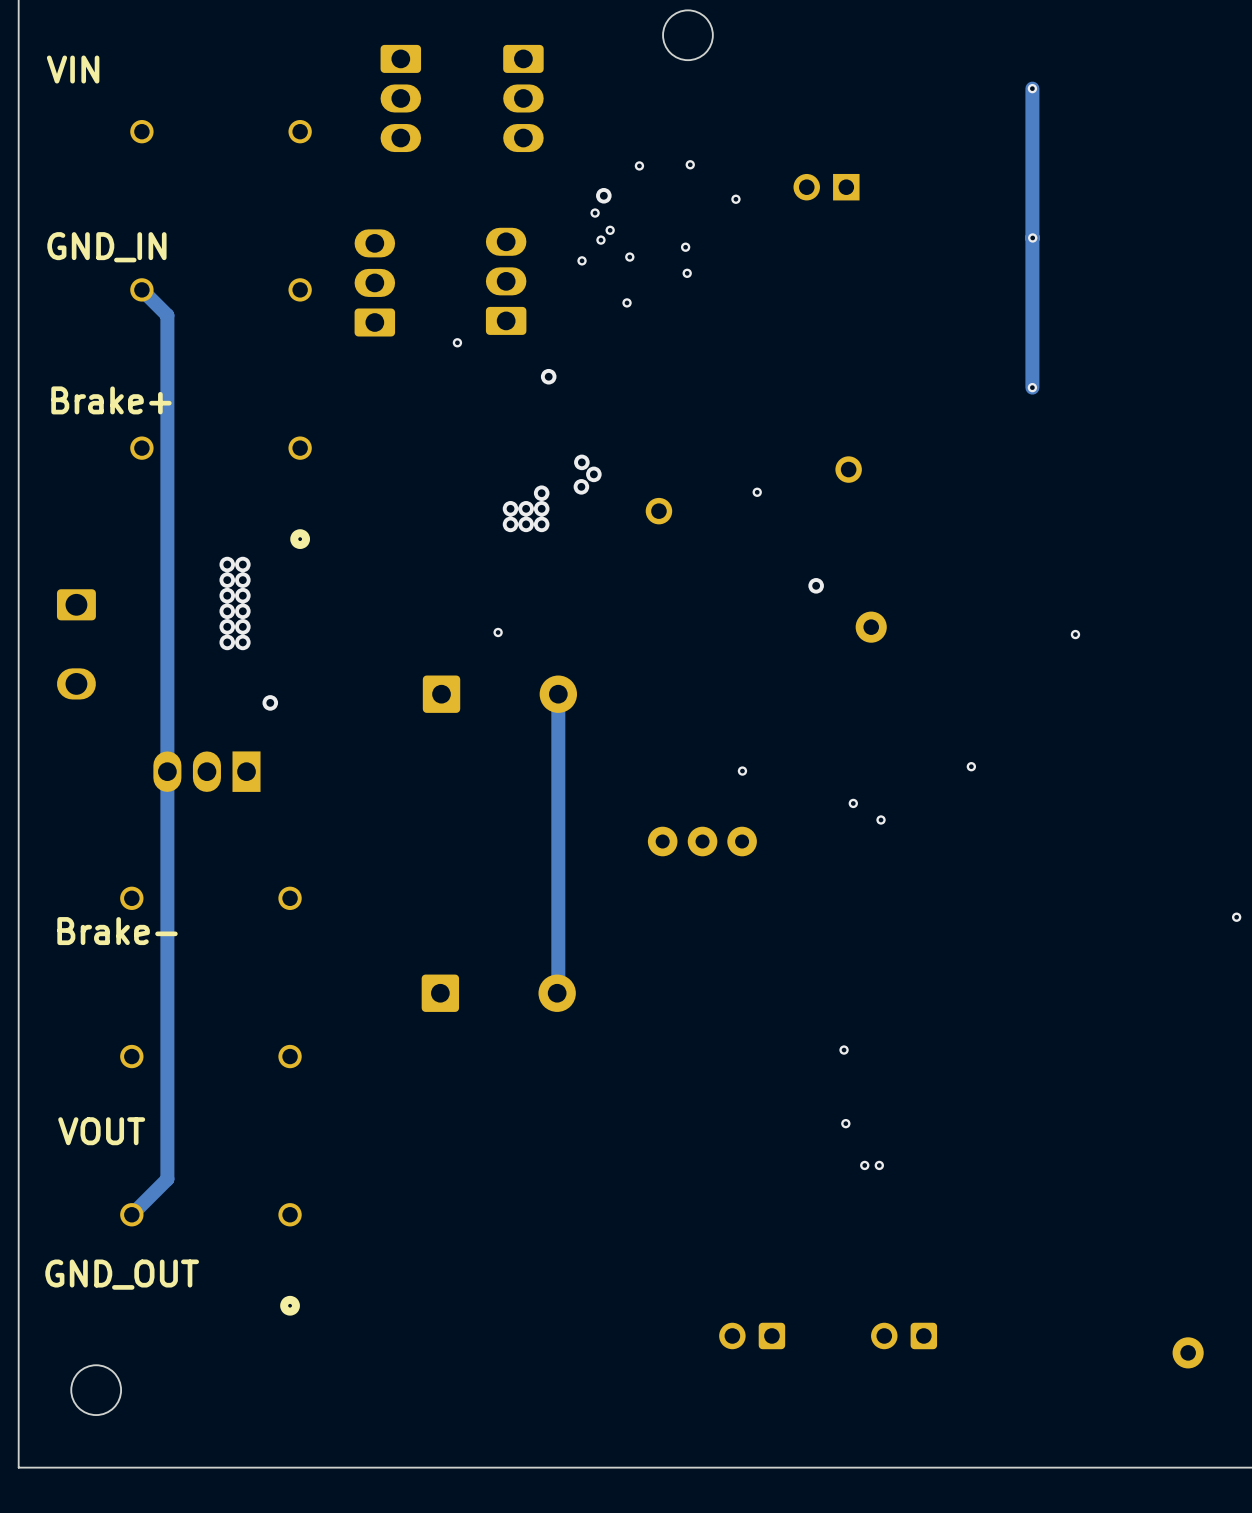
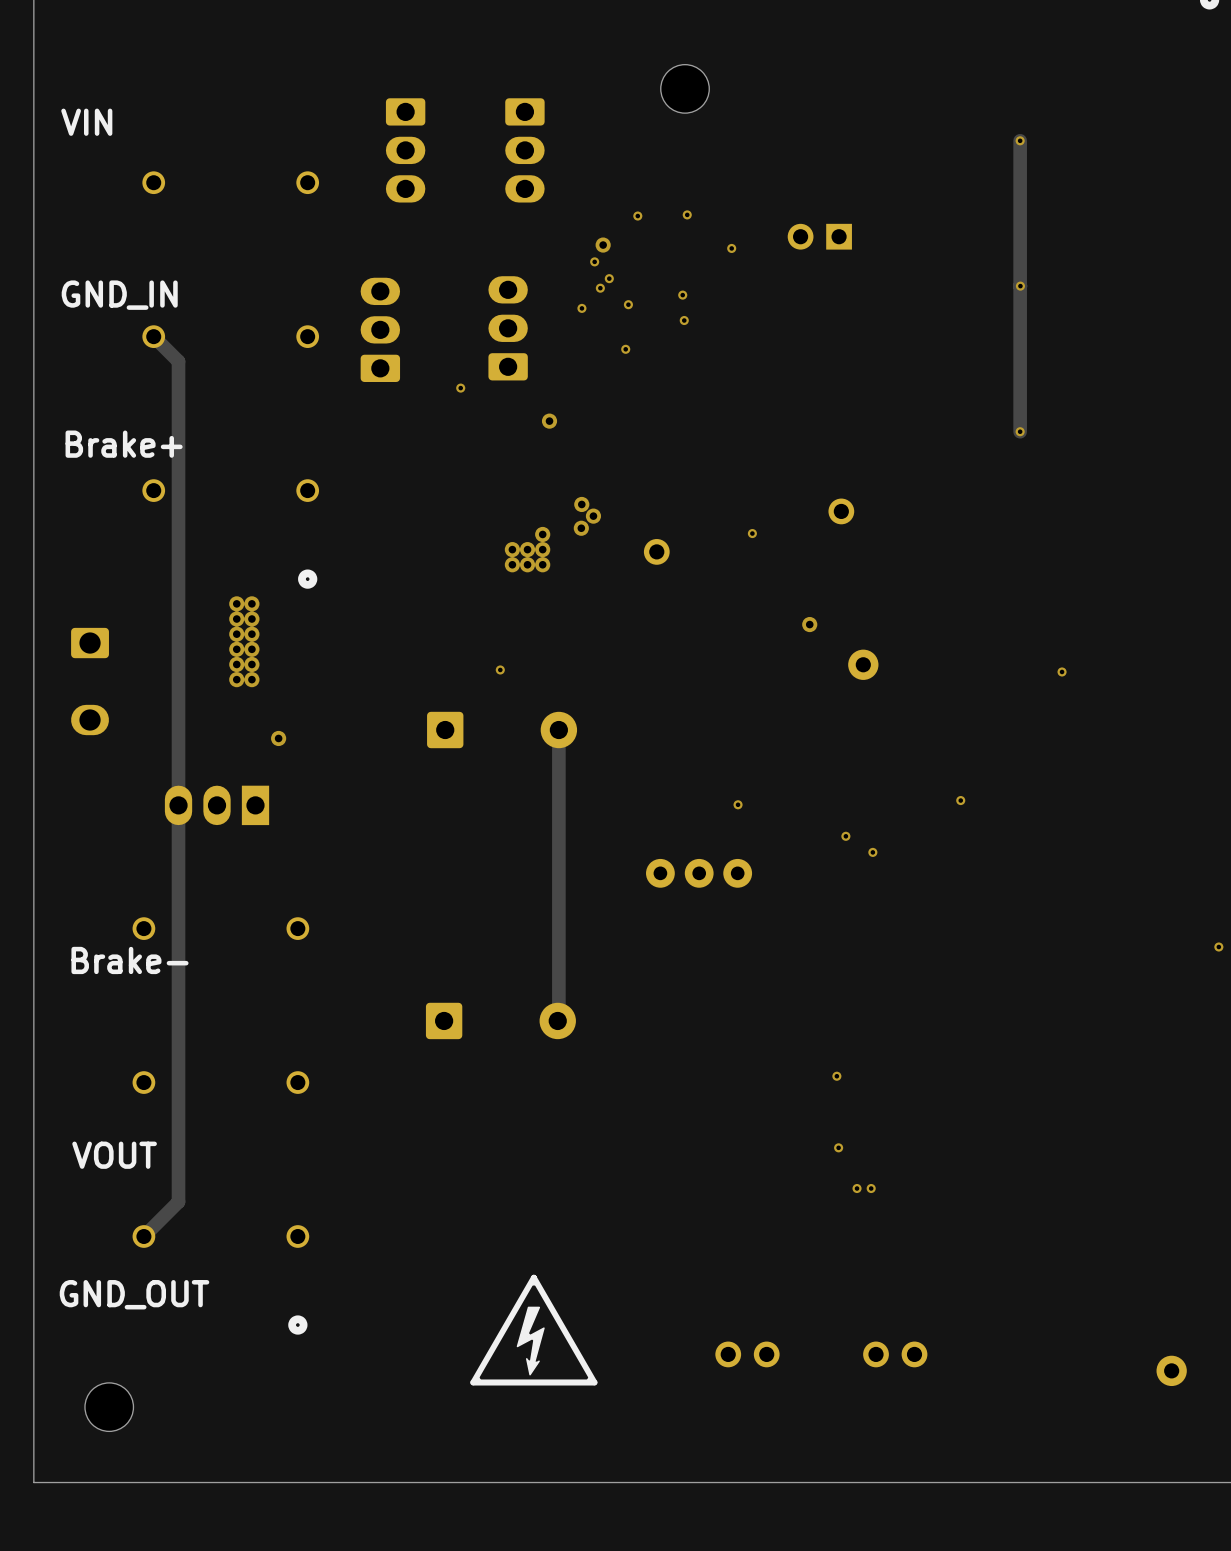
drawing: none -> [470, 1274, 598, 1386]
part footprint: [719, 1322, 786, 1350] -> [715, 1341, 780, 1368]
part footprint: [871, 1322, 938, 1350] -> [863, 1341, 928, 1368]

